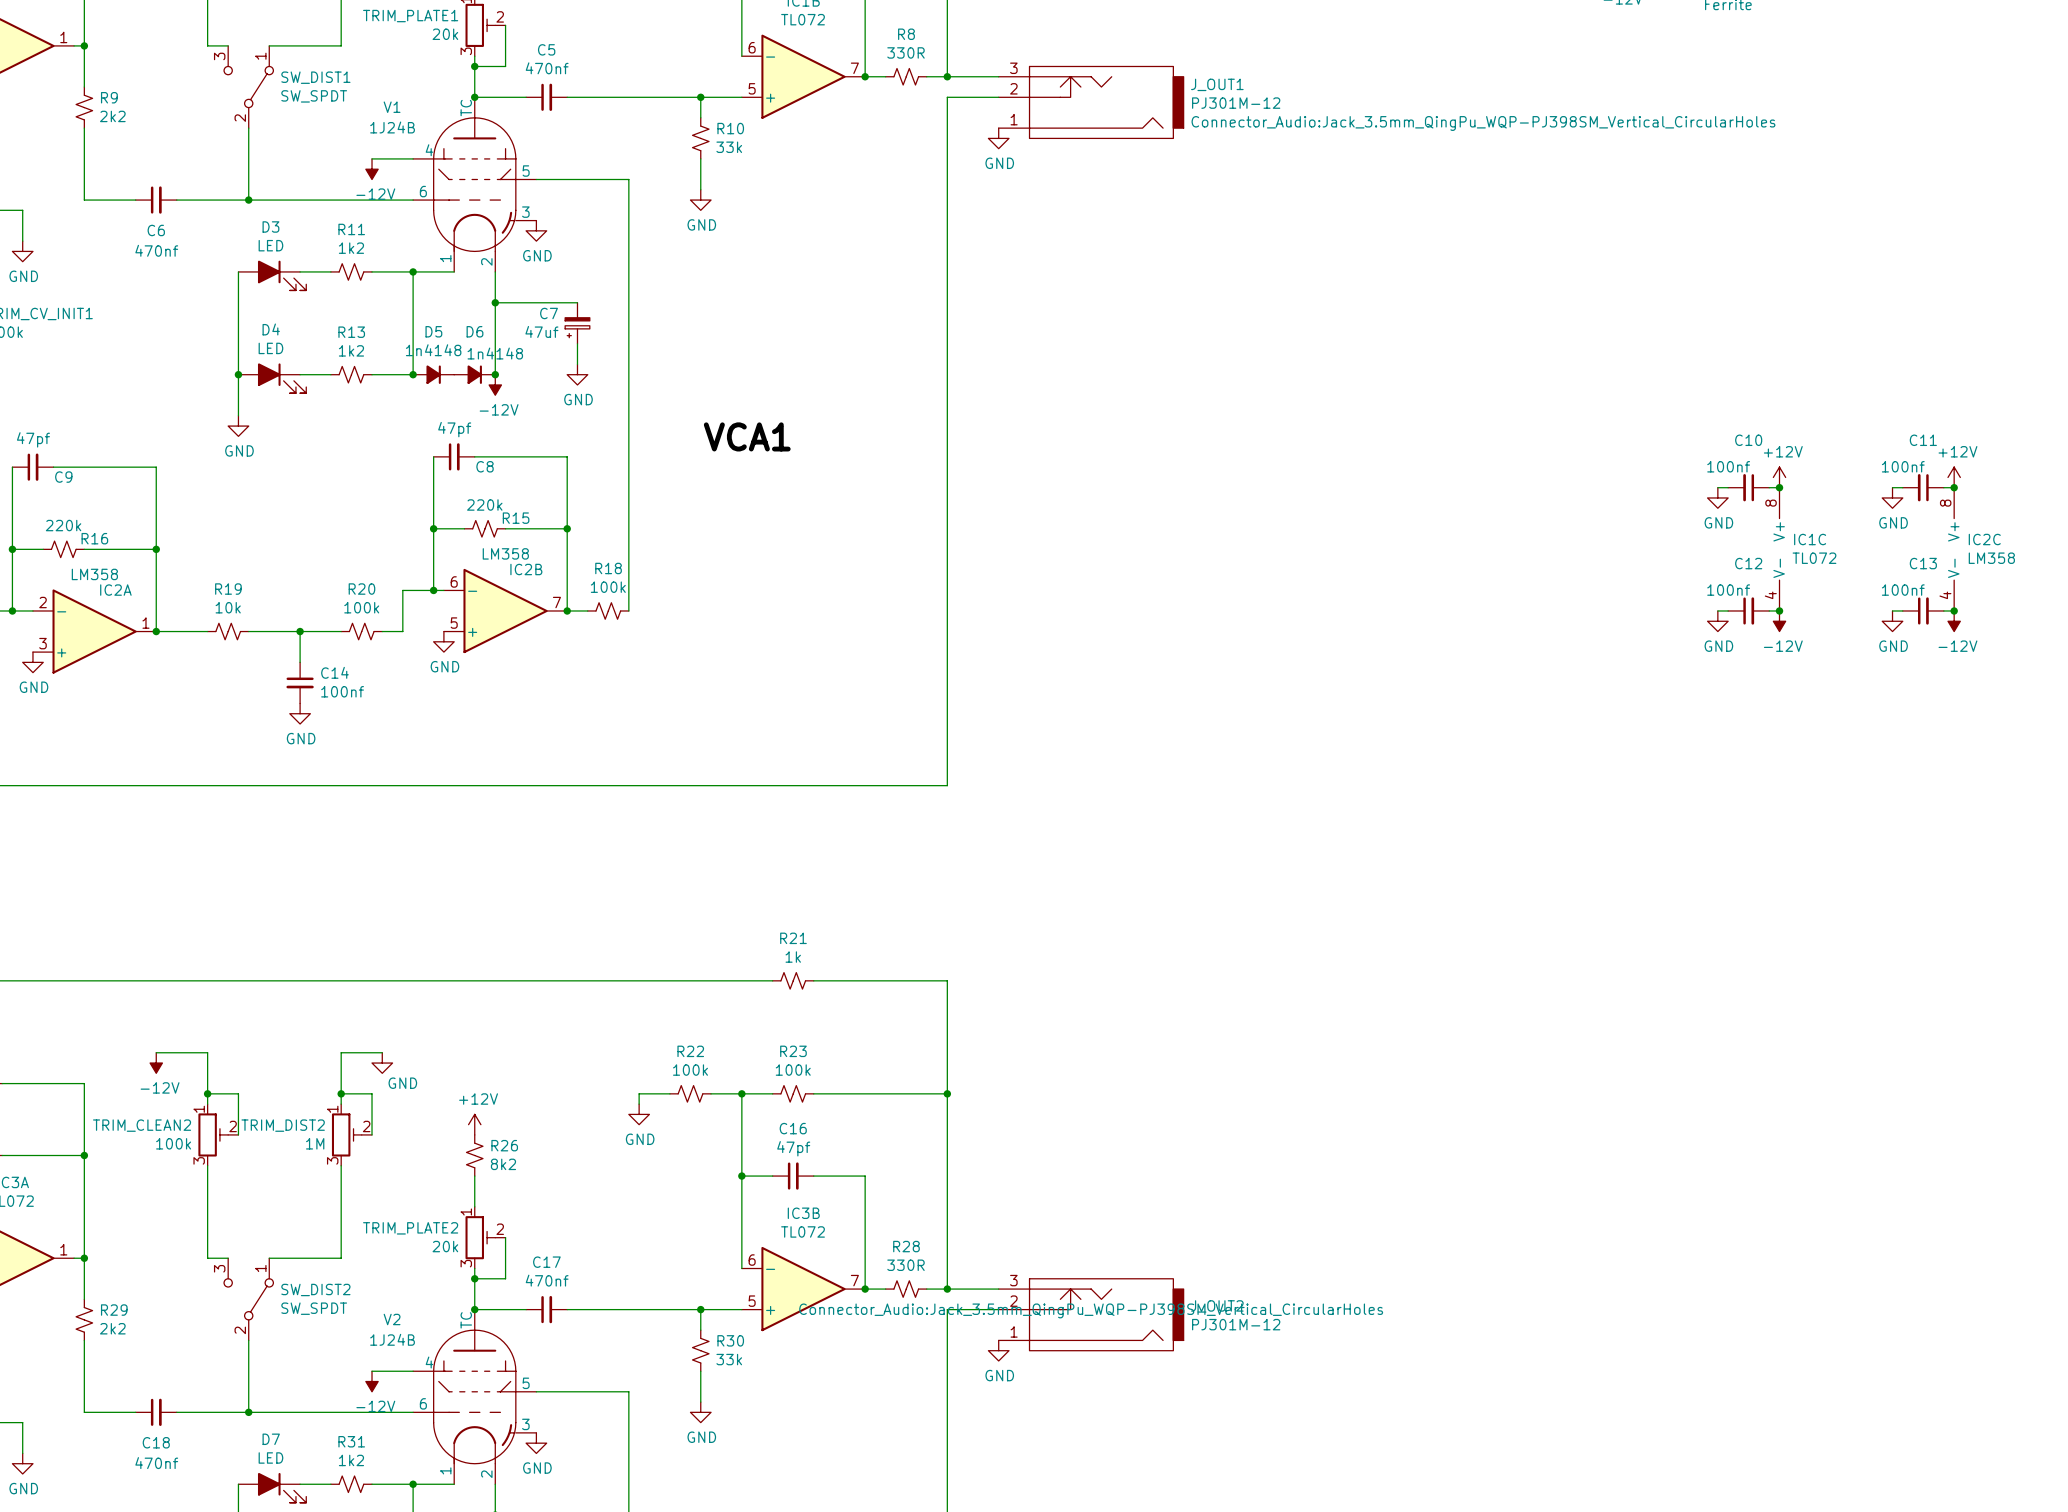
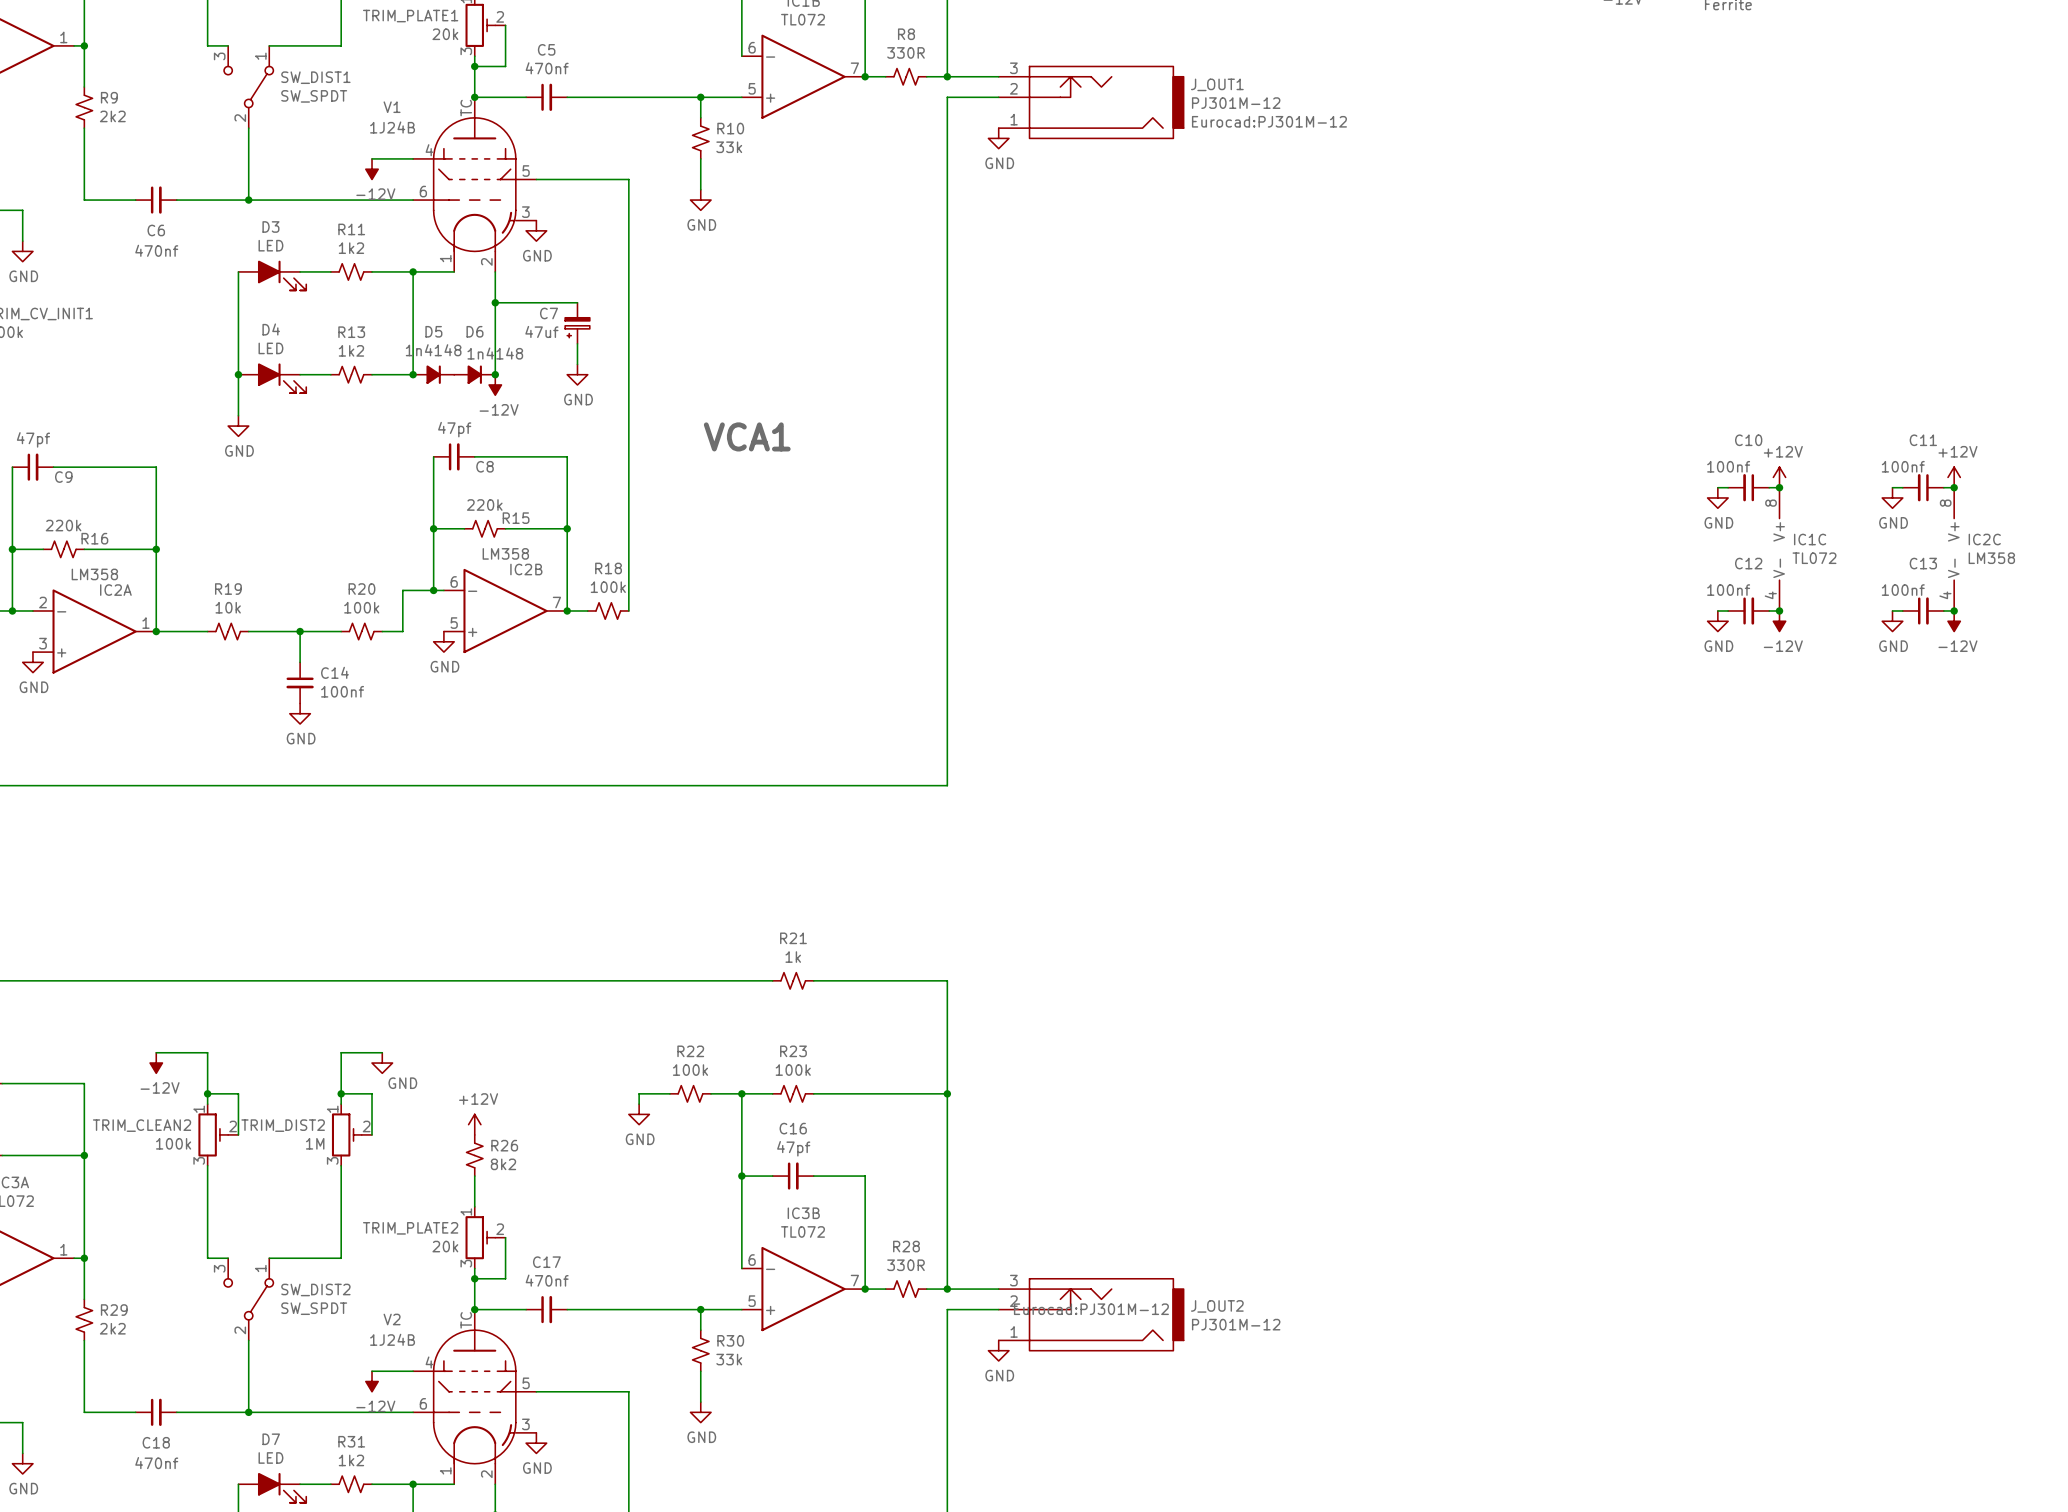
J_OUT1 text: Connector_Audio:Jack_3.5mm_QingPu_WQP-PJ398SM_Vertical_CircularHoles (1483, 123) -> Eurocad:PJ301M-12 (1269, 121)
J_OUT2 text: Connector_Audio:Jack_3.5mm_QingPu_WQP-PJ398SM_Vertical_CircularHoles (1091, 1310) -> Eurocad:PJ301M-12 (1091, 1309)

